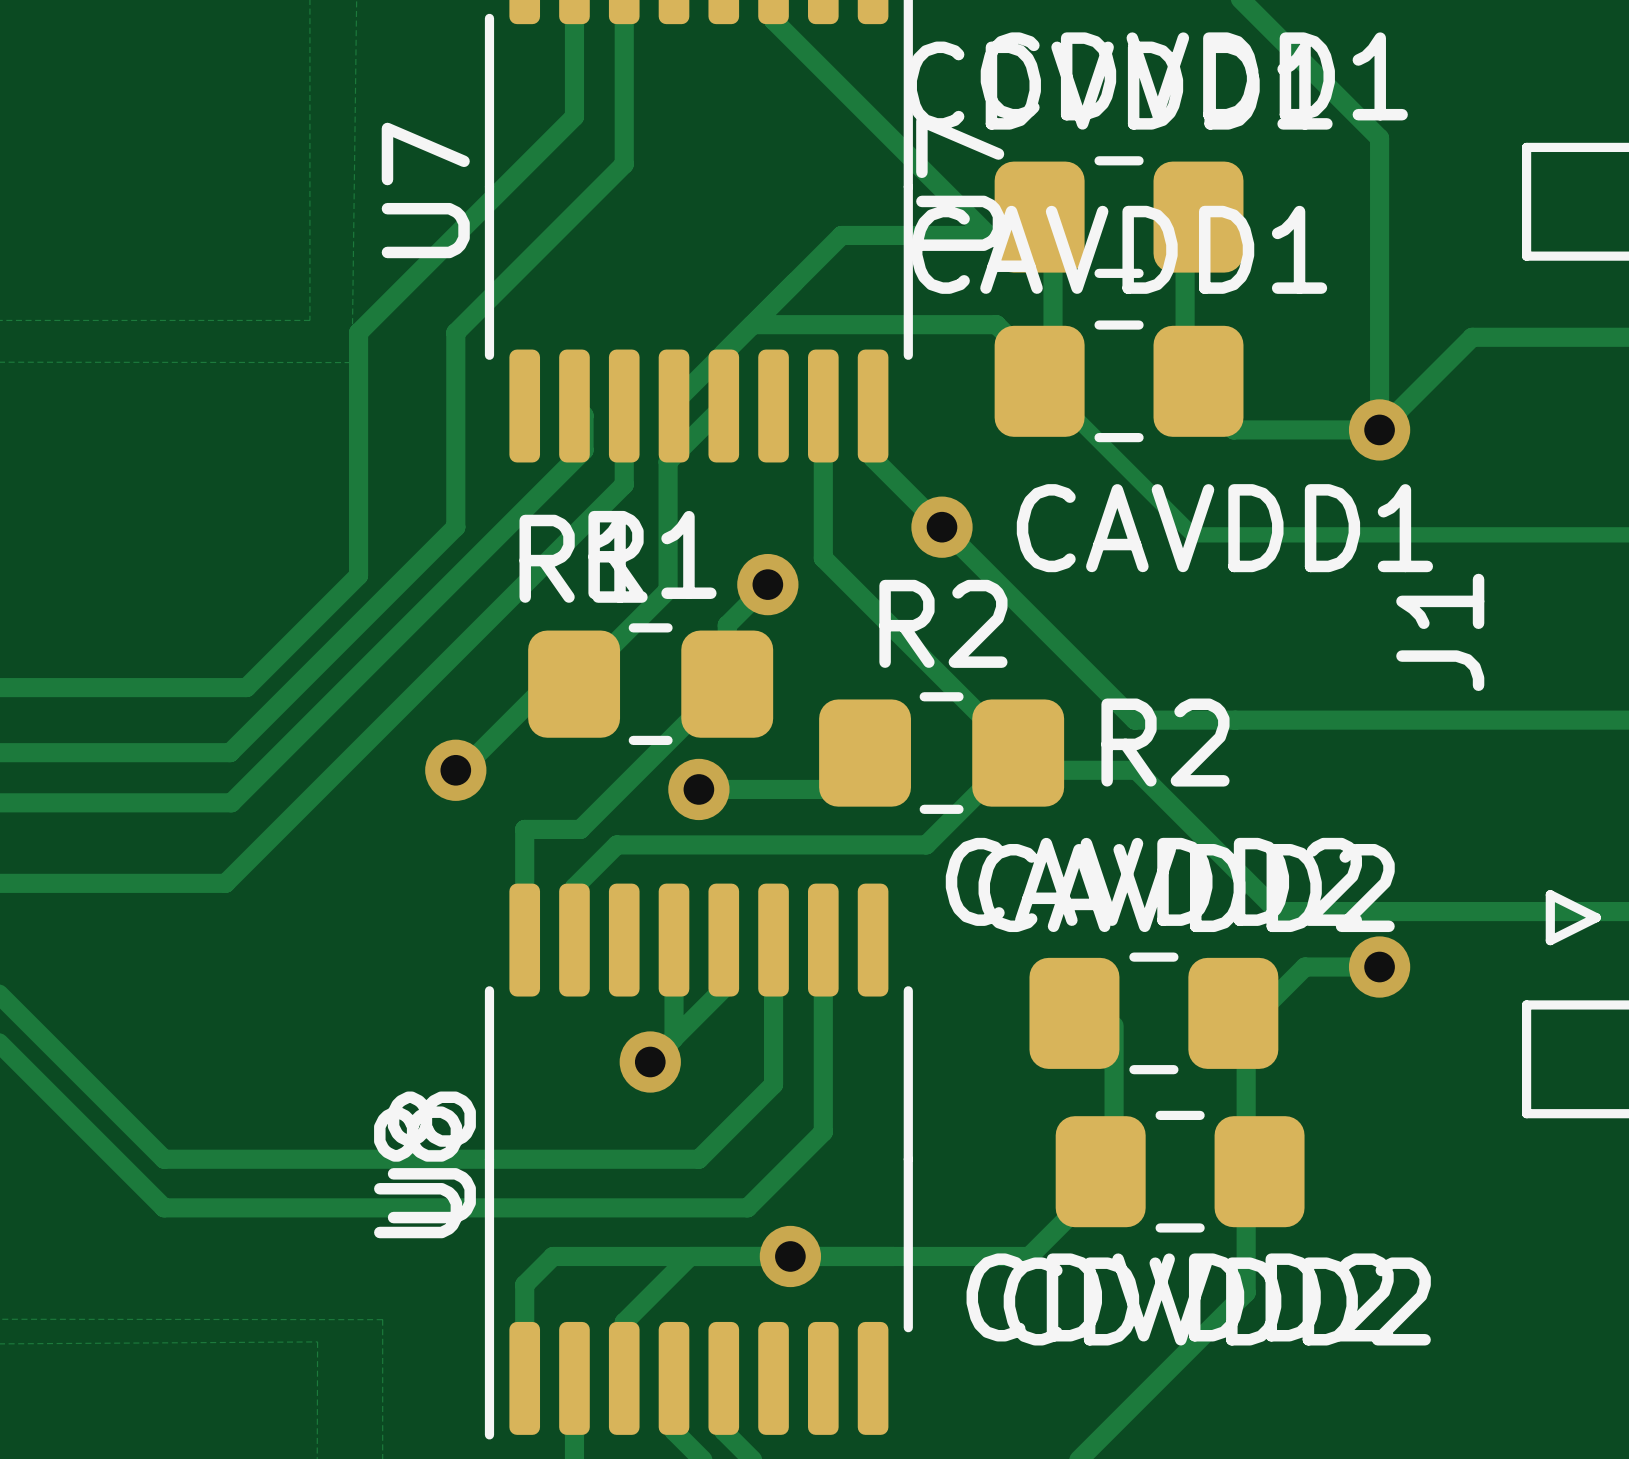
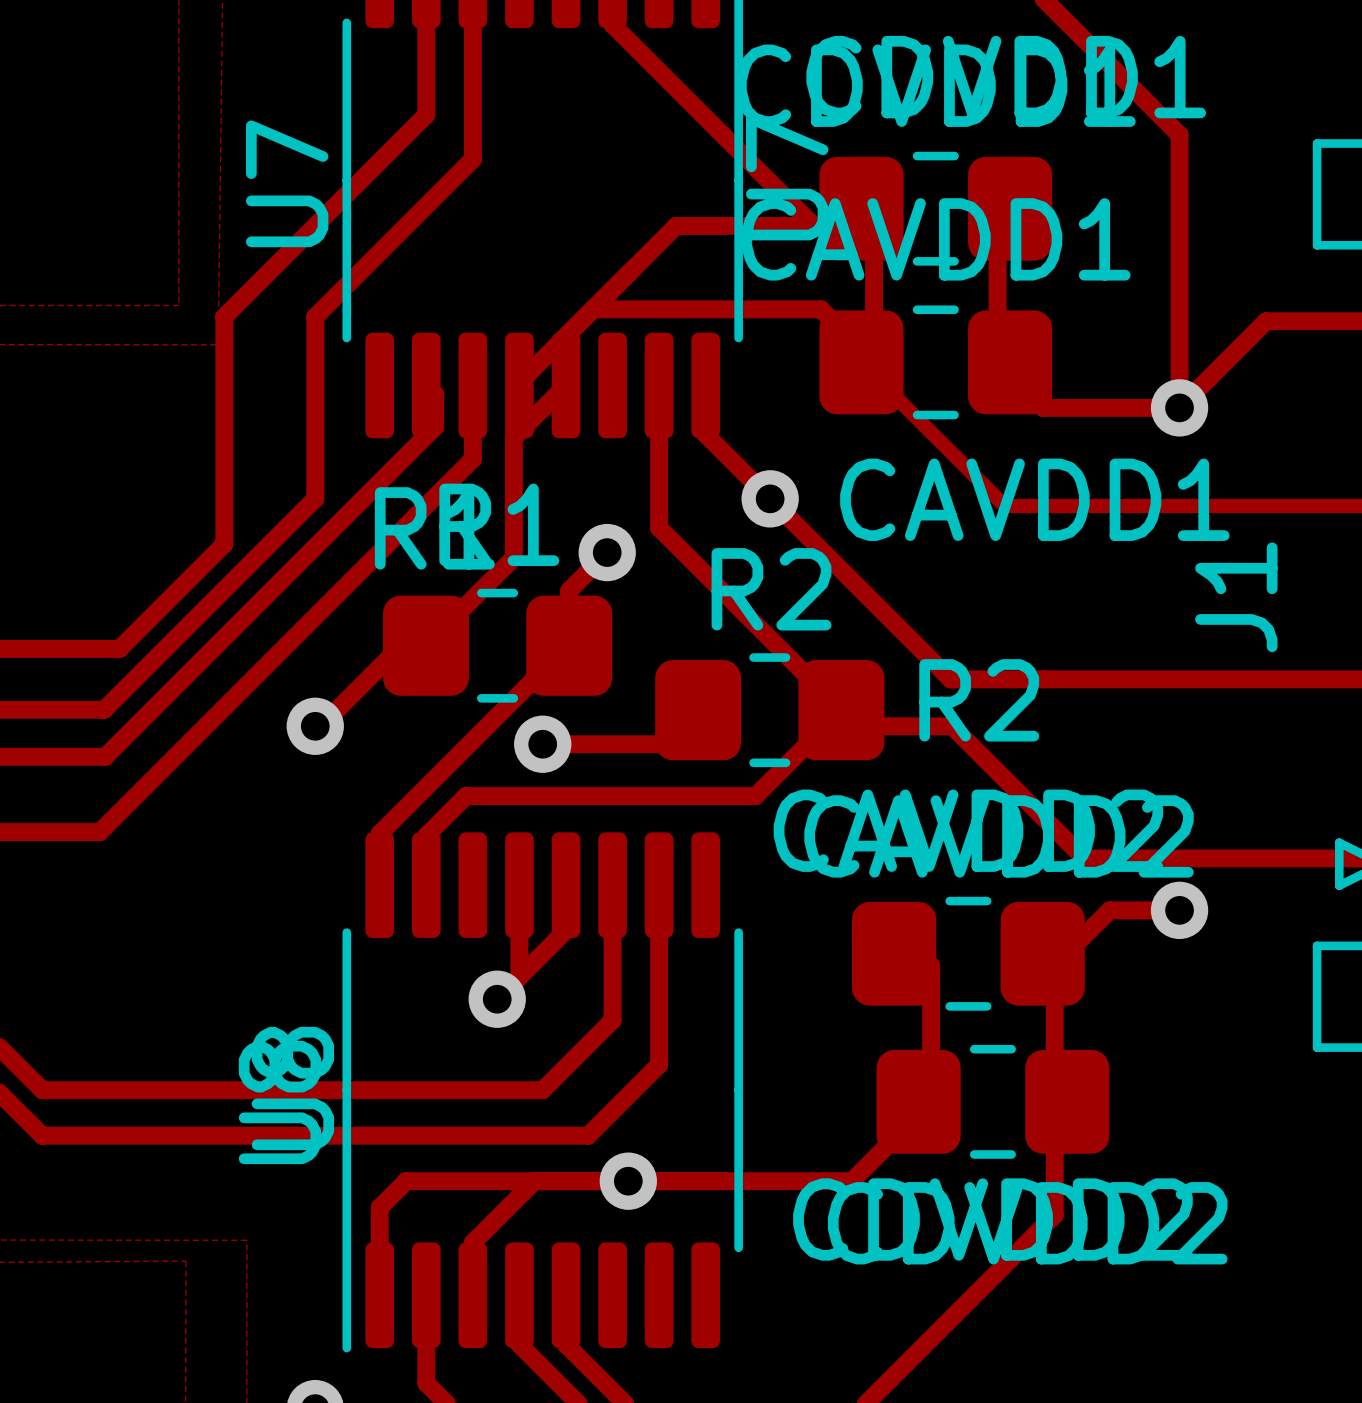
track: (580, 829) (524, 829) (524, 885) -> (431, 781) (379, 833)

